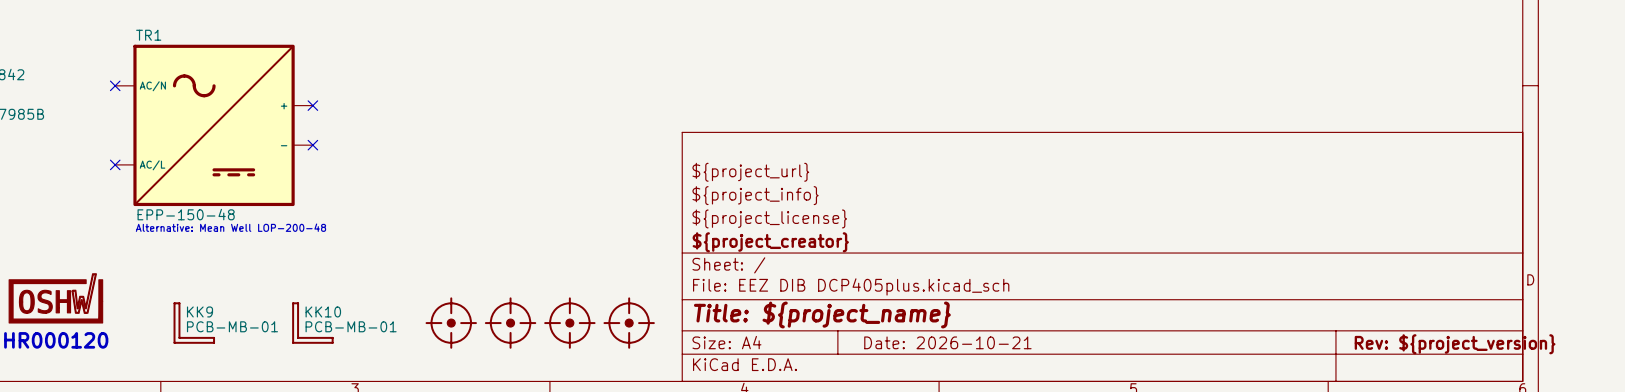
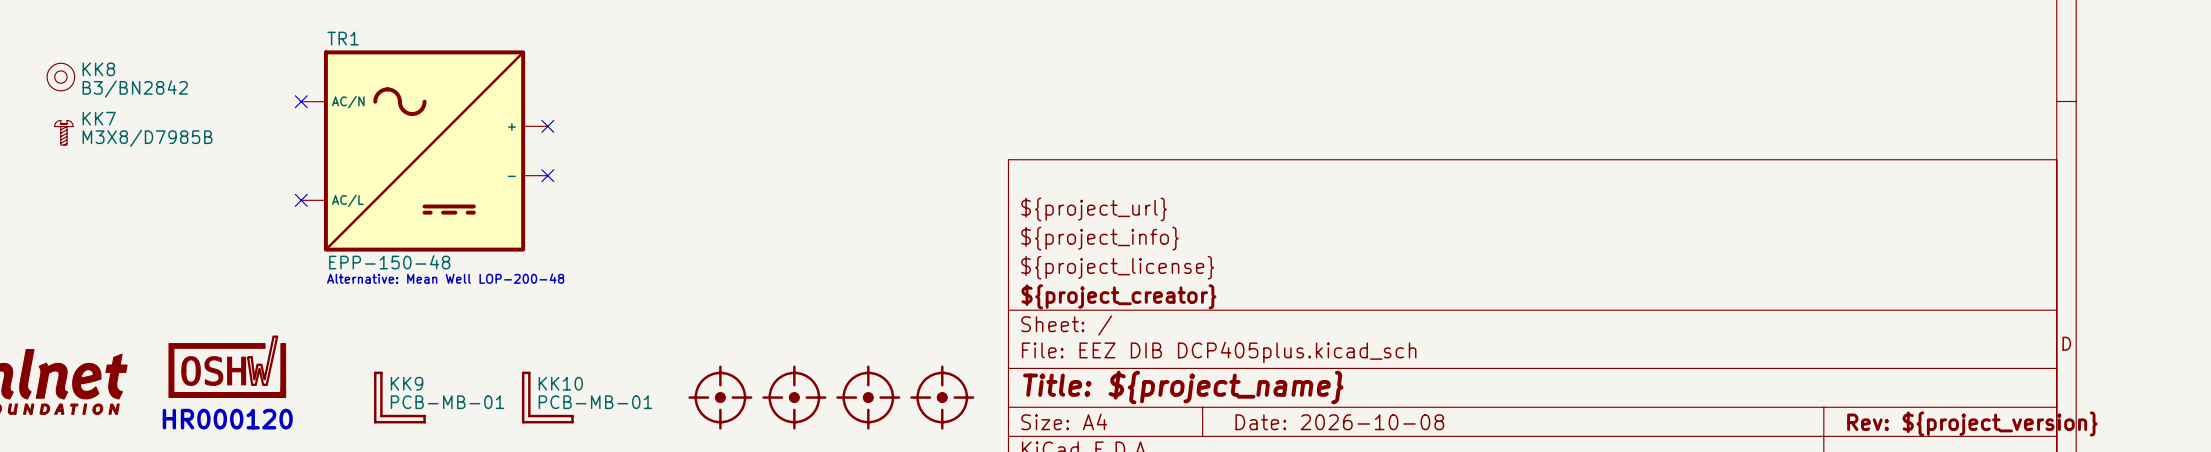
title block: Date: 2026-10-21 (947, 342) -> Date: 2026-10-08 (1339, 422)

